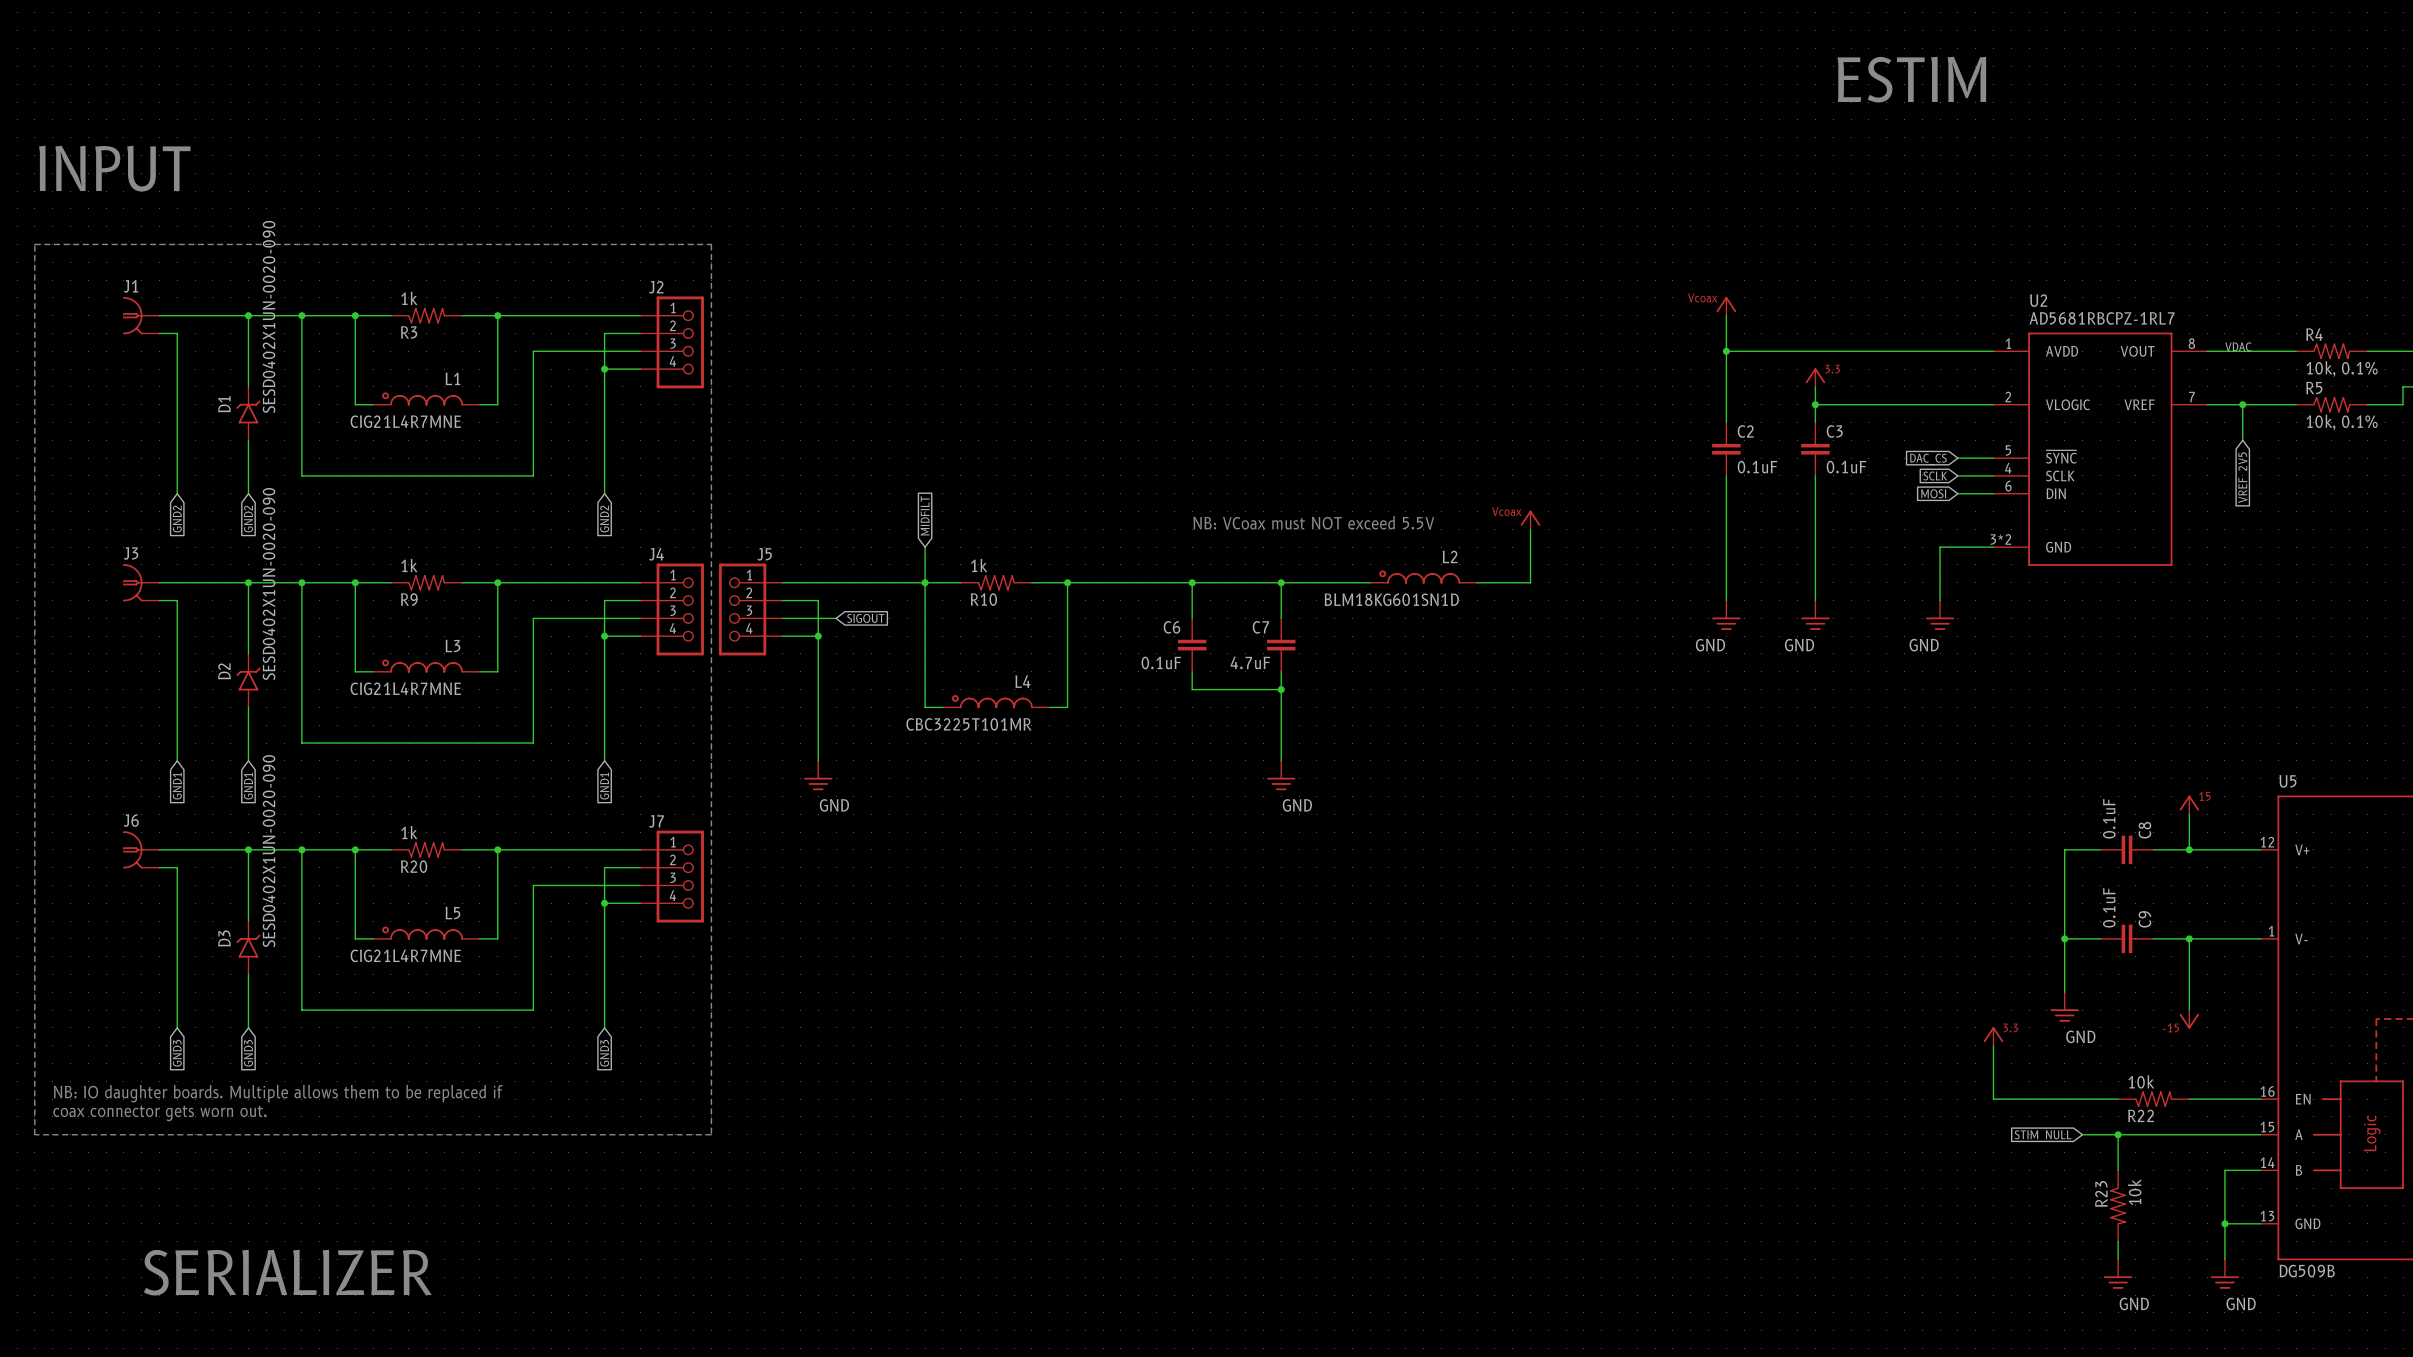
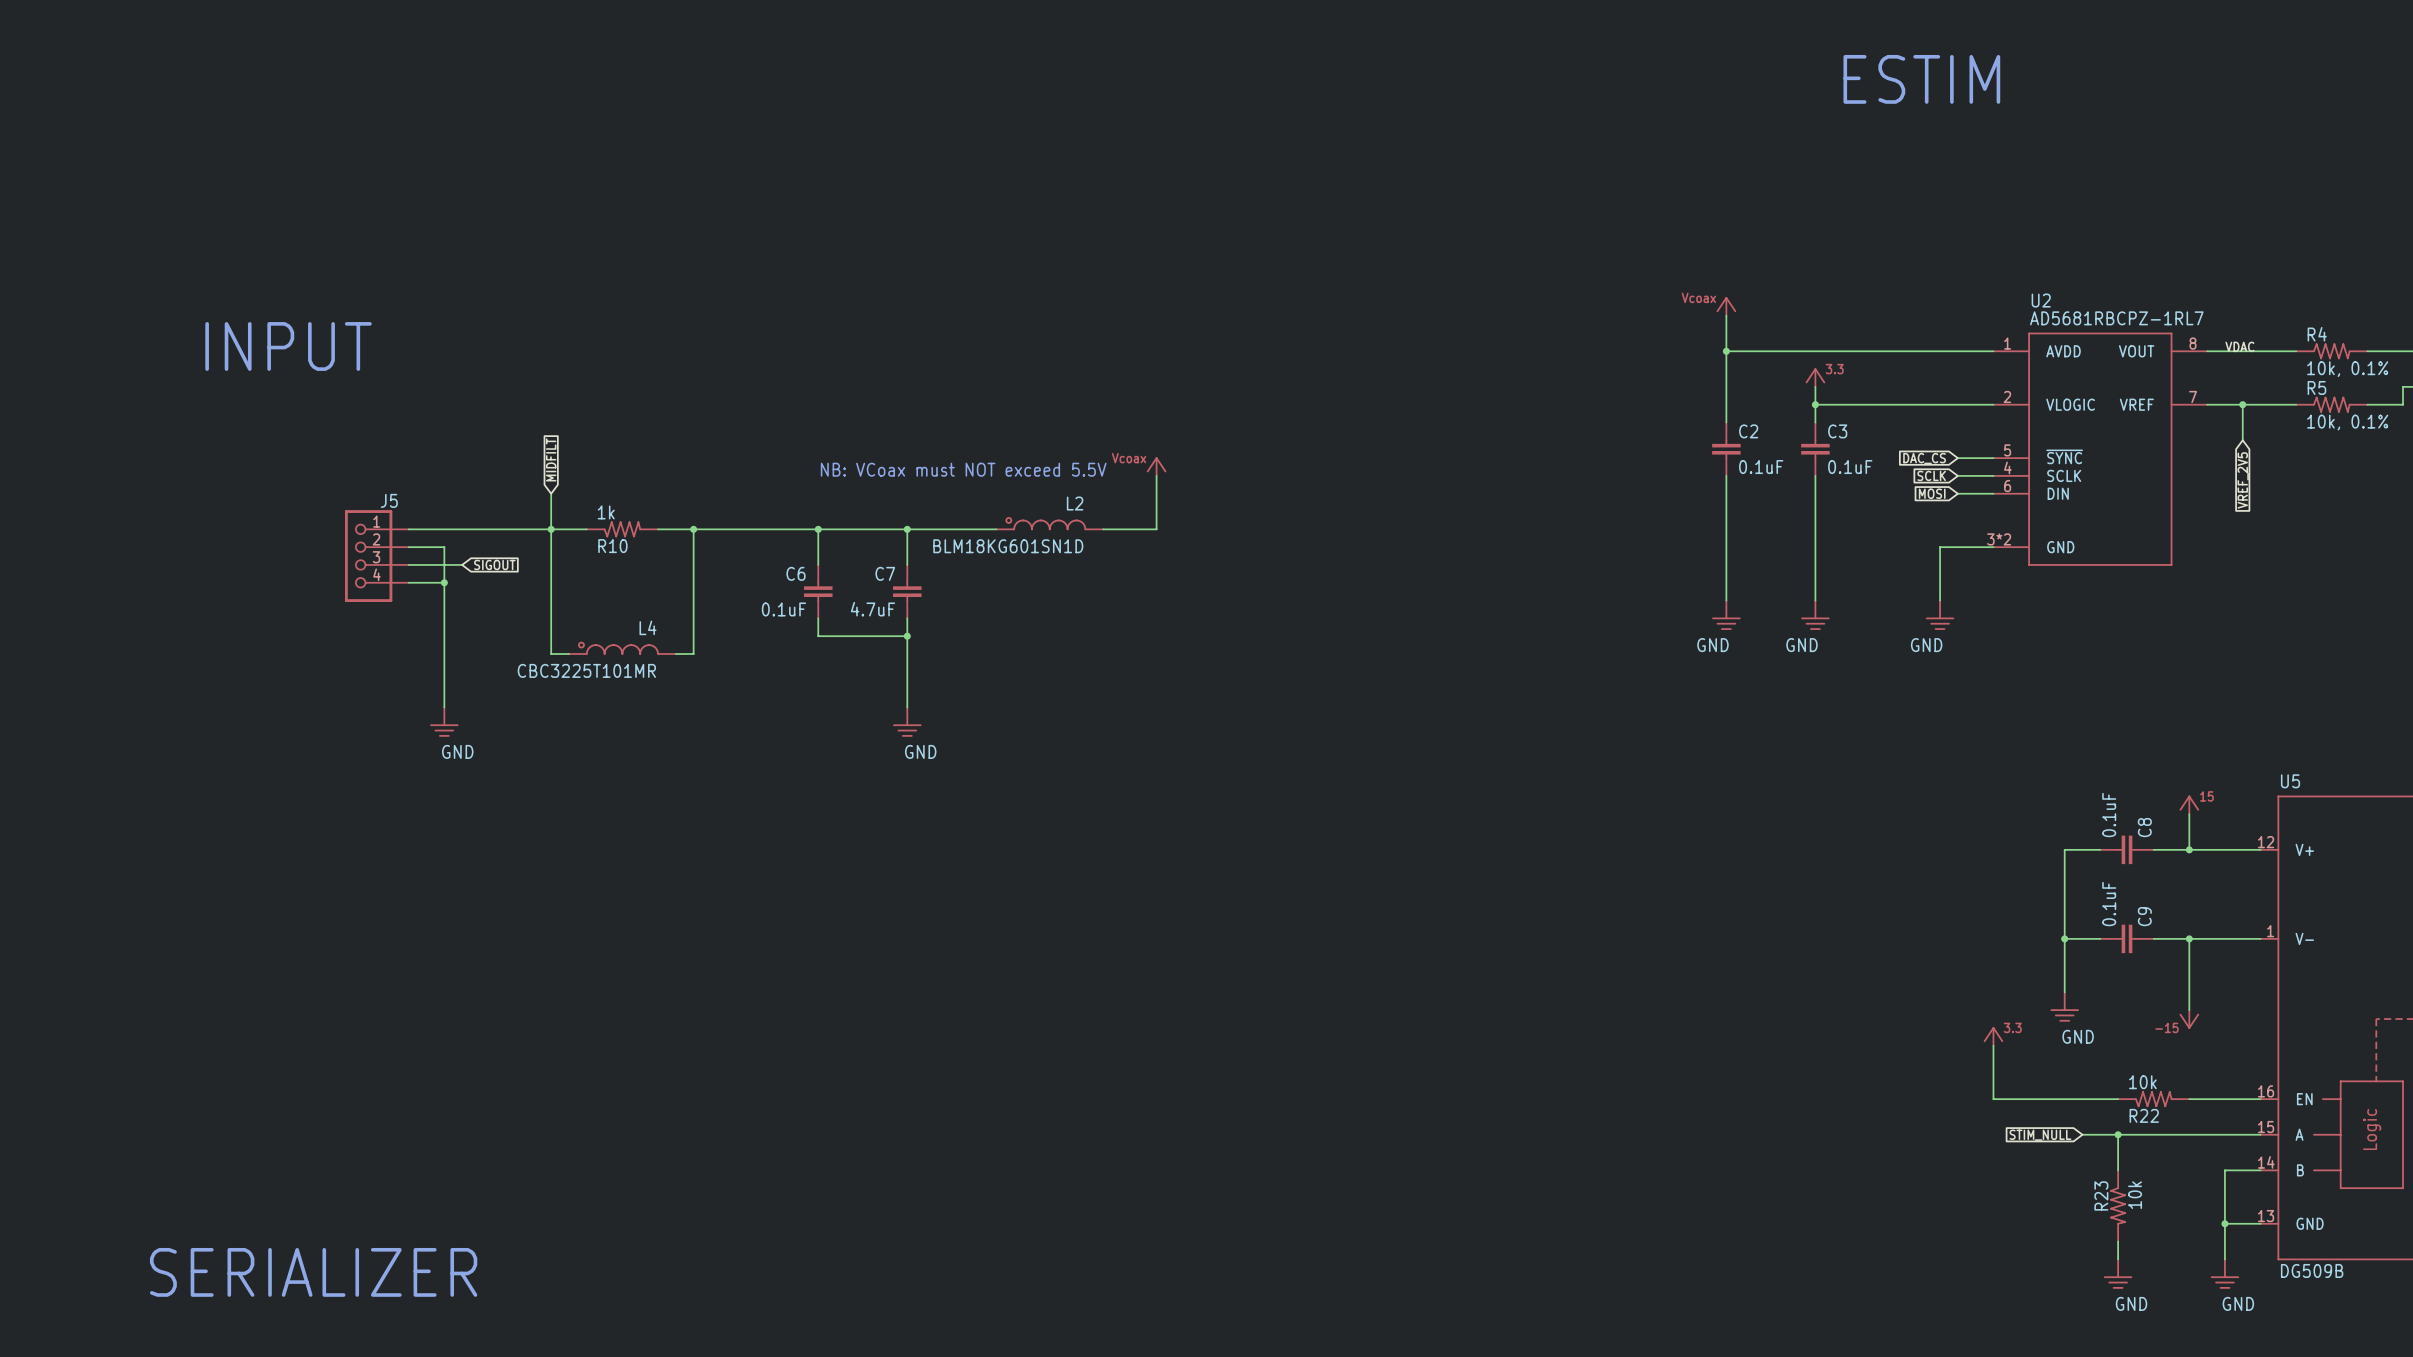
text: INPUT (114, 168) -> none
line: (34, 244) (711, 244) (711, 1134) (34, 1134) (34, 244) -> none
J1: (141, 315) -> none
wire: (159, 315) (390, 315) -> none
wire: (248, 315) (248, 386) -> none
junction: (248, 315) -> none
wire: (301, 315) (301, 475) (533, 475) (533, 351) (640, 351) -> none
junction: (301, 315) -> none
wire: (355, 315) (355, 404) (373, 404) -> none
junction: (355, 315) -> none
R3: 1k (426, 315) -> none
wire: (462, 315) (640, 315) -> none
wire: (497, 315) (497, 404) (479, 404) -> none
junction: (497, 315) -> none
wire: (159, 333) (177, 333) (177, 493) -> none
wire: (640, 333) (604, 333) (604, 493) -> none
J2: (672, 342) -> none
text: none -> INPUT (288, 346)
wire: (604, 369) (640, 369) -> none
junction: (604, 369) -> none
L1: CIG21L4R7MNE (426, 399) -> none
D1: SESD0402X1UN-0020-090 (248, 413) -> none
wire: (248, 440) (248, 493) -> none
global label: none -> MIDFILT (551, 459)
power symbol: none -> (1156, 466)
text: none -> NB: VCoax must NOT exceed 5.5V (963, 469)
wire: none -> (1156, 475) (1156, 529) (1103, 529)
wire: none -> (551, 493) (551, 653) (568, 653)
global label: MIDFILT (925, 515) -> none
global label: GND2 (177, 519) -> none
global label: GND2 (248, 519) -> none
global label: GND2 (604, 519) -> none
power symbol: (1530, 520) -> none
text: NB: VCoax must NOT exceed 5.5V (1313, 522) -> none
junction: none -> (551, 529)
wire: none -> (658, 529) (996, 529)
wire: none -> (693, 529) (693, 653) (675, 653)
junction: none -> (693, 529)
wire: none -> (818, 529) (818, 564)
junction: none -> (818, 529)
wire: none -> (907, 529) (907, 564)
junction: none -> (907, 529)
wire: (1530, 529) (1530, 582) (1477, 582) -> none
wire: none -> (408, 547) (444, 547) (444, 707)
wire: (925, 547) (925, 707) (942, 707) -> none
wire: none -> (408, 564) (462, 564)
global label: none -> SIGOUT (494, 564)
L2 position: (1423, 577) -> (1049, 523)
J3: (141, 582) -> none
wire: (159, 582) (390, 582) -> none
wire: (248, 582) (248, 653) -> none
junction: (248, 582) -> none
wire: (301, 582) (301, 743) (533, 743) (533, 618) (640, 618) -> none
junction: (301, 582) -> none
wire: (355, 582) (355, 671) (373, 671) -> none
junction: (355, 582) -> none
wire: none -> (408, 582) (444, 582)
R9: 1k (426, 582) -> none
junction: none -> (444, 582)
wire: (462, 582) (640, 582) -> (408, 529) (586, 529)
wire: (497, 582) (497, 671) (479, 671) -> none
junction: (497, 582) -> none
wire: (782, 582) (960, 582) -> none
junction: (925, 582) -> none
R10 position: (996, 582) -> (622, 529)
wire: (1031, 582) (1370, 582) -> none
wire: (1067, 582) (1067, 707) (1049, 707) -> none
junction: (1067, 582) -> none
wire: (1192, 582) (1192, 618) -> none
junction: (1192, 582) -> none
wire: (1281, 582) (1281, 618) -> none
junction: (1281, 582) -> none
wire: (159, 600) (177, 600) (177, 760) -> none
wire: (640, 600) (604, 600) (604, 760) -> none
wire: (782, 600) (818, 600) (818, 618) -> none
J4: (672, 609) -> none
J5 position: (750, 609) -> (376, 556)
wire: (782, 618) (836, 618) -> none
global label: SIGOUT (865, 618) -> none
wire: none -> (907, 618) (907, 707)
wire: (604, 636) (640, 636) -> none
junction: (604, 636) -> none
wire: (782, 636) (818, 636) (818, 760) -> none
wire: none -> (818, 636) (907, 636)
junction: (818, 636) -> none
junction: none -> (907, 636)
C6 position: (1192, 645) -> (818, 591)
C7 position: (1281, 645) -> (907, 591)
L3: CIG21L4R7MNE (426, 666) -> none
wire: (1192, 671) (1192, 689) (1281, 689) -> none
wire: (1281, 671) (1281, 760) -> none
D2: SESD0402X1UN-0020-090 (248, 680) -> none
junction: (1281, 689) -> none
L4 position: (996, 701) -> (622, 648)
wire: (248, 707) (248, 760) -> none
power symbol: none -> GND (444, 722)
power symbol position: GND (818, 775) -> GND (907, 722)
power symbol: GND (1281, 775) -> none
global label: GND1 (177, 786) -> none
global label: GND1 (248, 786) -> none
global label: GND1 (604, 786) -> none
J6: (141, 849) -> none
wire: (159, 849) (390, 849) -> none
wire: (248, 849) (248, 921) -> none
junction: (248, 849) -> none
wire: (301, 849) (301, 1010) (533, 1010) (533, 885) (640, 885) -> none
junction: (301, 849) -> none
wire: (355, 849) (355, 938) (373, 938) -> none
junction: (355, 849) -> none
R20: 1k (426, 849) -> none
wire: (462, 849) (640, 849) -> none
wire: (497, 849) (497, 938) (479, 938) -> none
junction: (497, 849) -> none
wire: (159, 867) (177, 867) (177, 1027) -> none
wire: (640, 867) (604, 867) (604, 1027) -> none
J7: (672, 876) -> none
wire: (604, 903) (640, 903) -> none
junction: (604, 903) -> none
L5: CIG21L4R7MNE (426, 933) -> none
D3: SESD0402X1UN-0020-090 (248, 947) -> none
wire: (248, 974) (248, 1027) -> none
global label: GND3 (177, 1053) -> none
global label: GND3 (248, 1053) -> none
global label: GND3 (604, 1053) -> none
text: NB: IO daughter boards. Multiple allows them to be replaced if (278, 1093) -> none
text: coax connector gets worn out. (159, 1113) -> none

